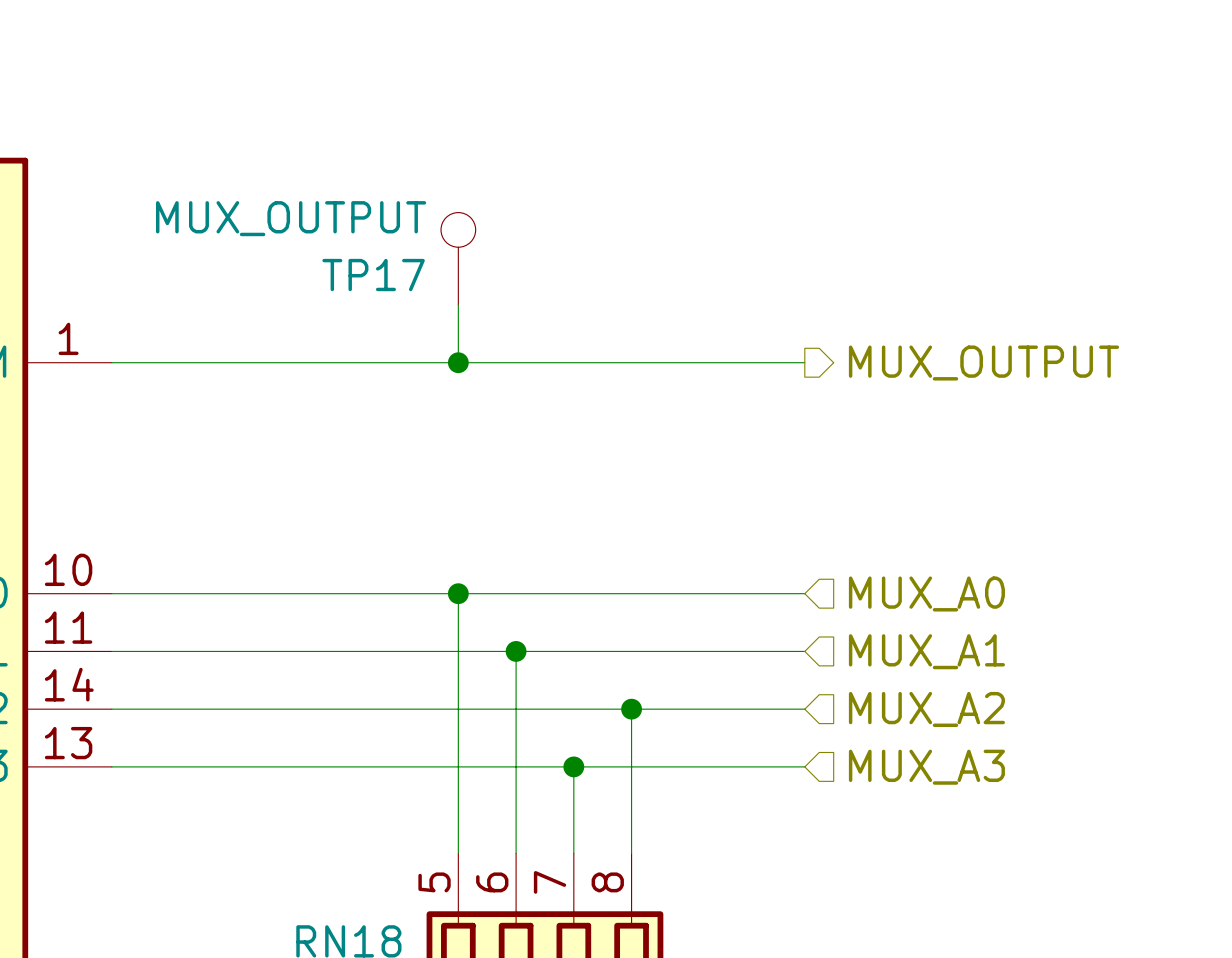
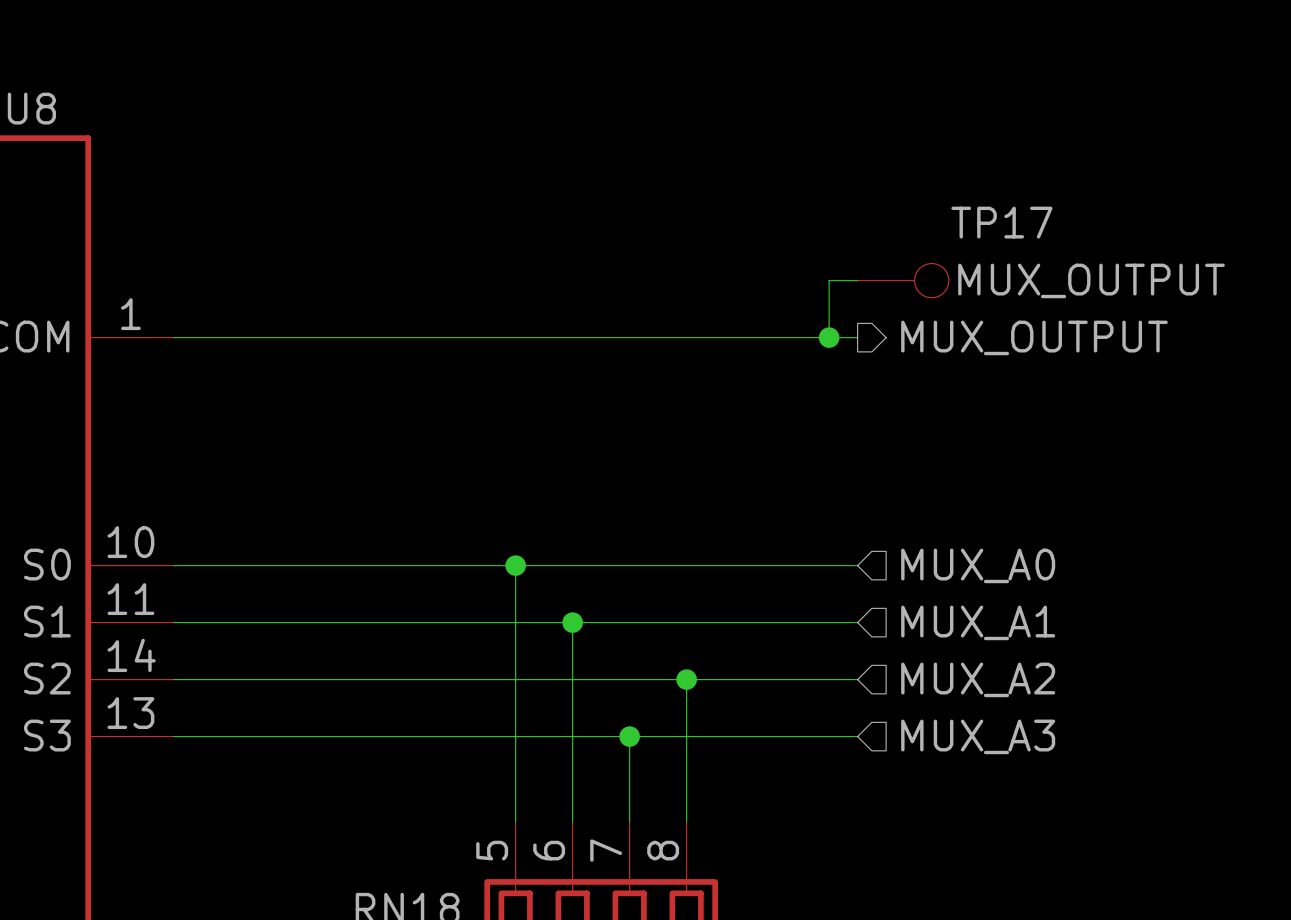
TP17 value position: MUX_OUTPUT (291, 218) -> MUX_OUTPUT (1091, 280)
TP17 rotation: 0° (458, 229) -> 90° clockwise (931, 280)
TP17 position: (458, 258) -> (903, 280)
TP17 name position: TP17 (373, 275) -> TP17 (1001, 222)
wire: (458, 304) (458, 362) -> none
wire: none -> (857, 280) (829, 280) (829, 337)
junction: (458, 362) -> none
junction: none -> (829, 337)

